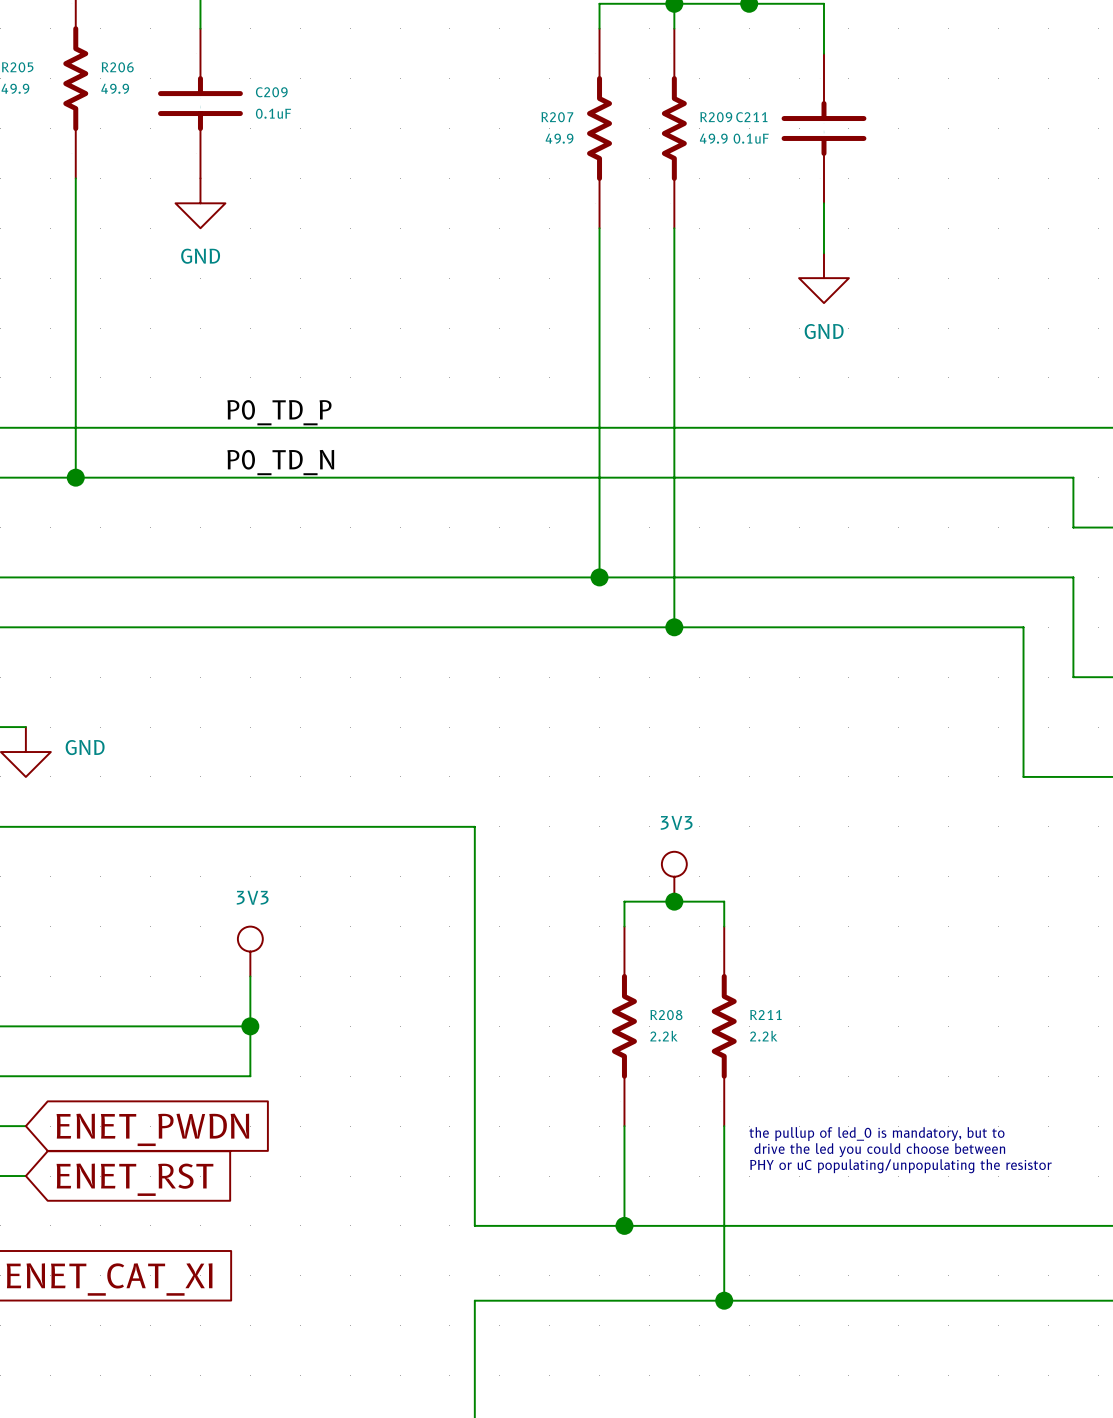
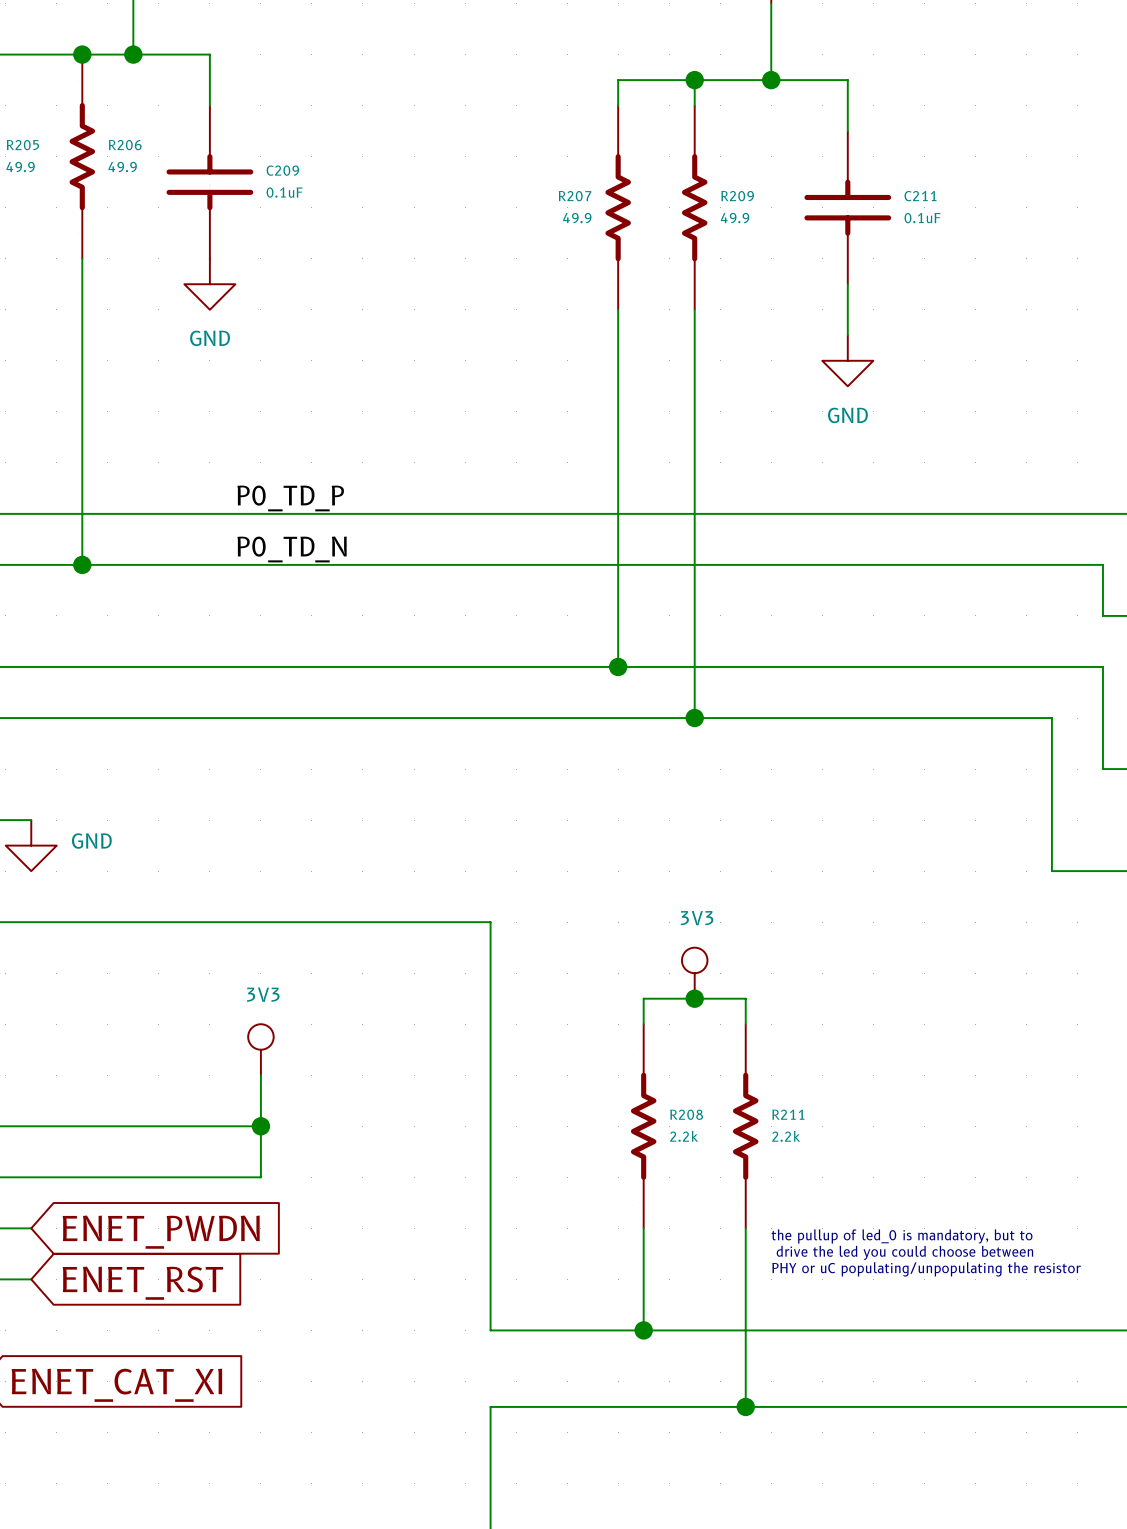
C211 name position: C211 (751, 117) -> C211 (920, 196)
C211 value position: 0.1uF (751, 138) -> 0.1uF (922, 218)

